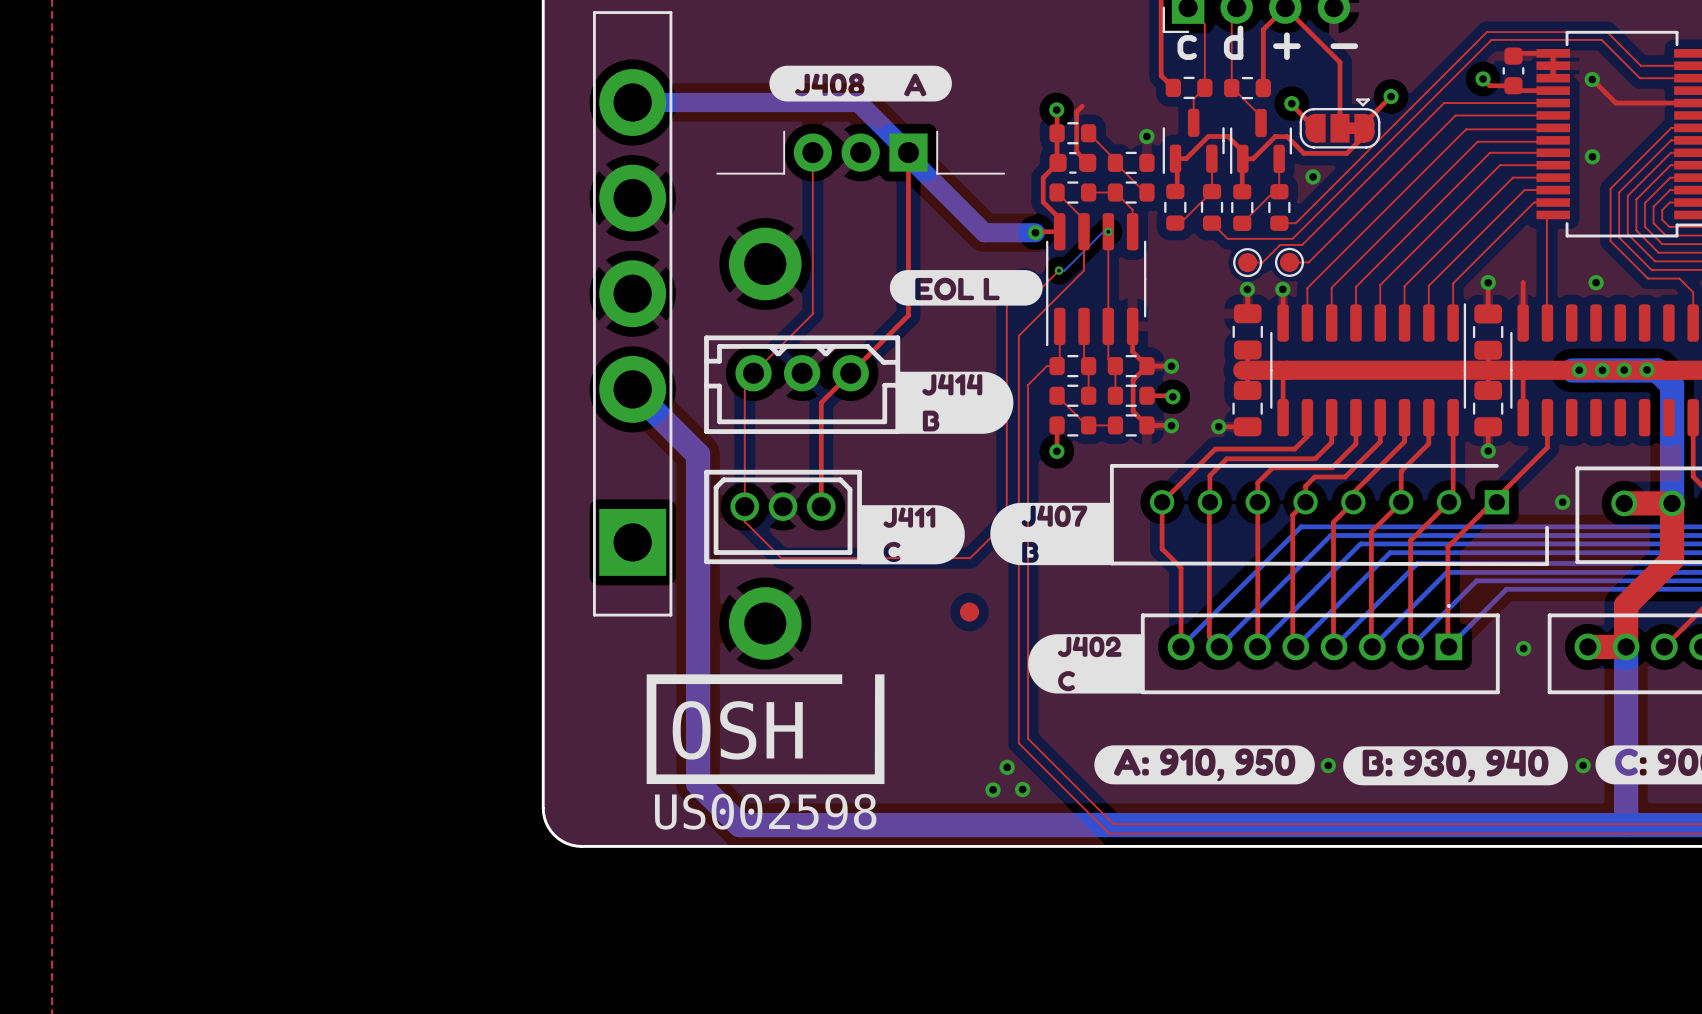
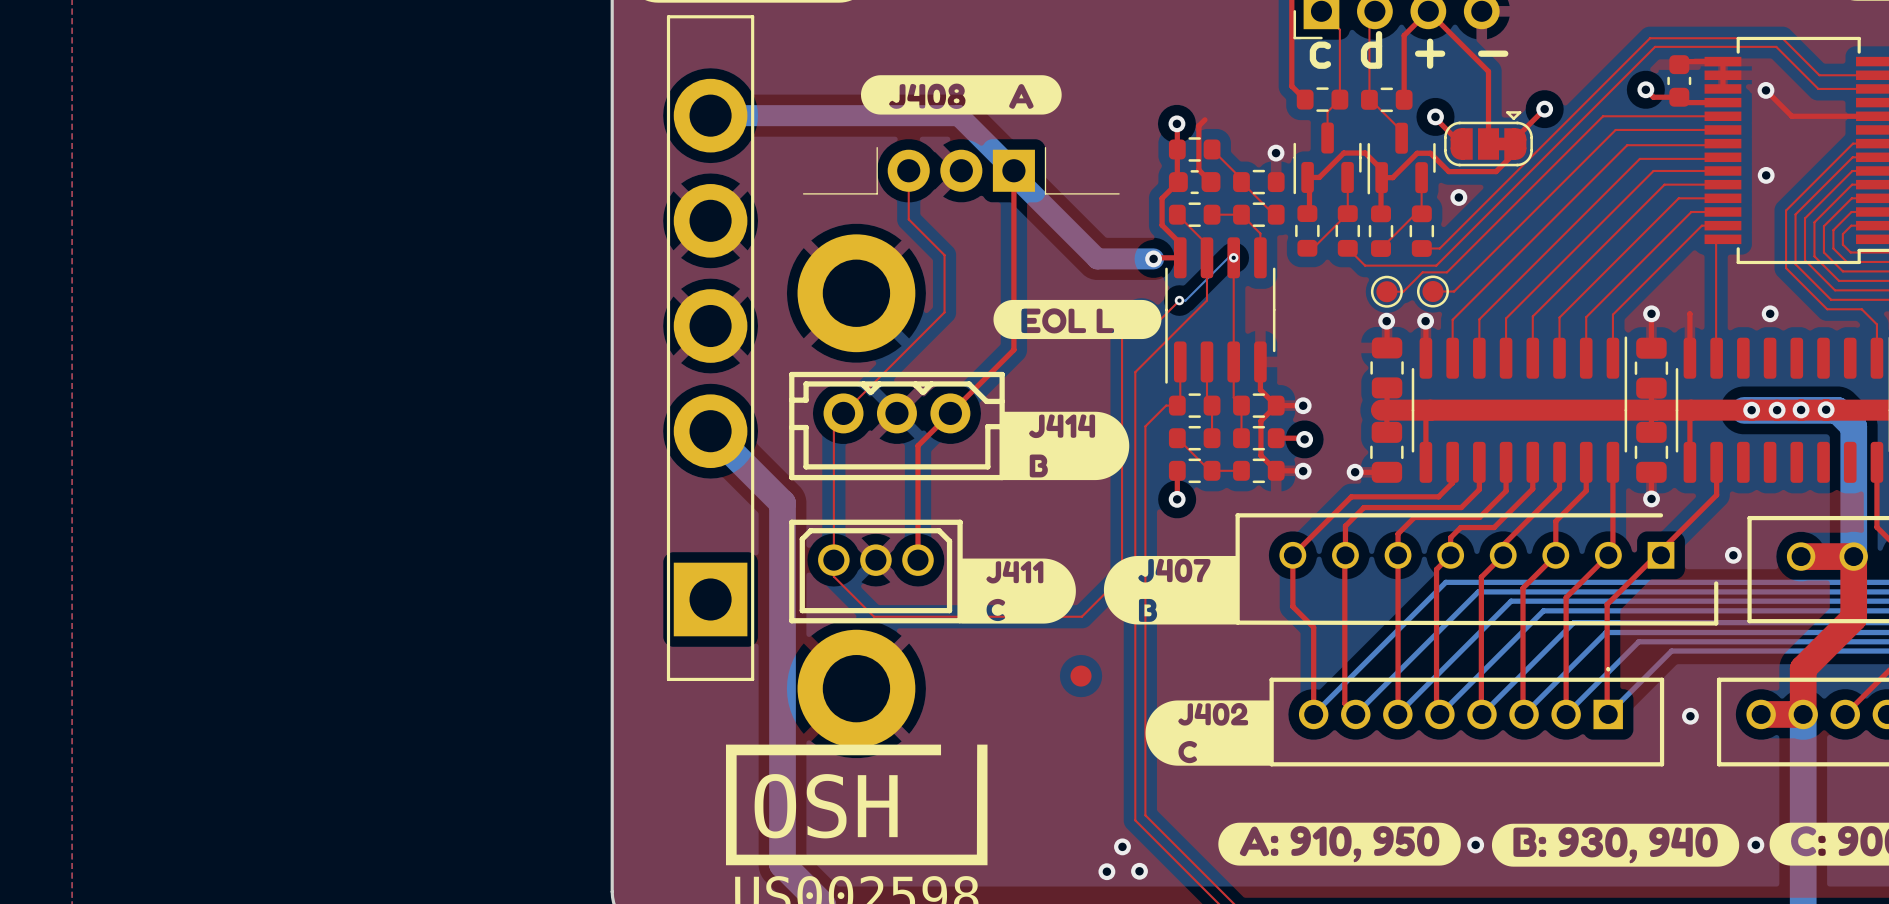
top track: (812, 196) (812, 313) -> (908, 219) (944, 255) (944, 312) (908, 348)
part footprint: [728, 227, 802, 301] -> [797, 234, 916, 353]
part footprint: [728, 587, 802, 660] -> [797, 629, 916, 748]

